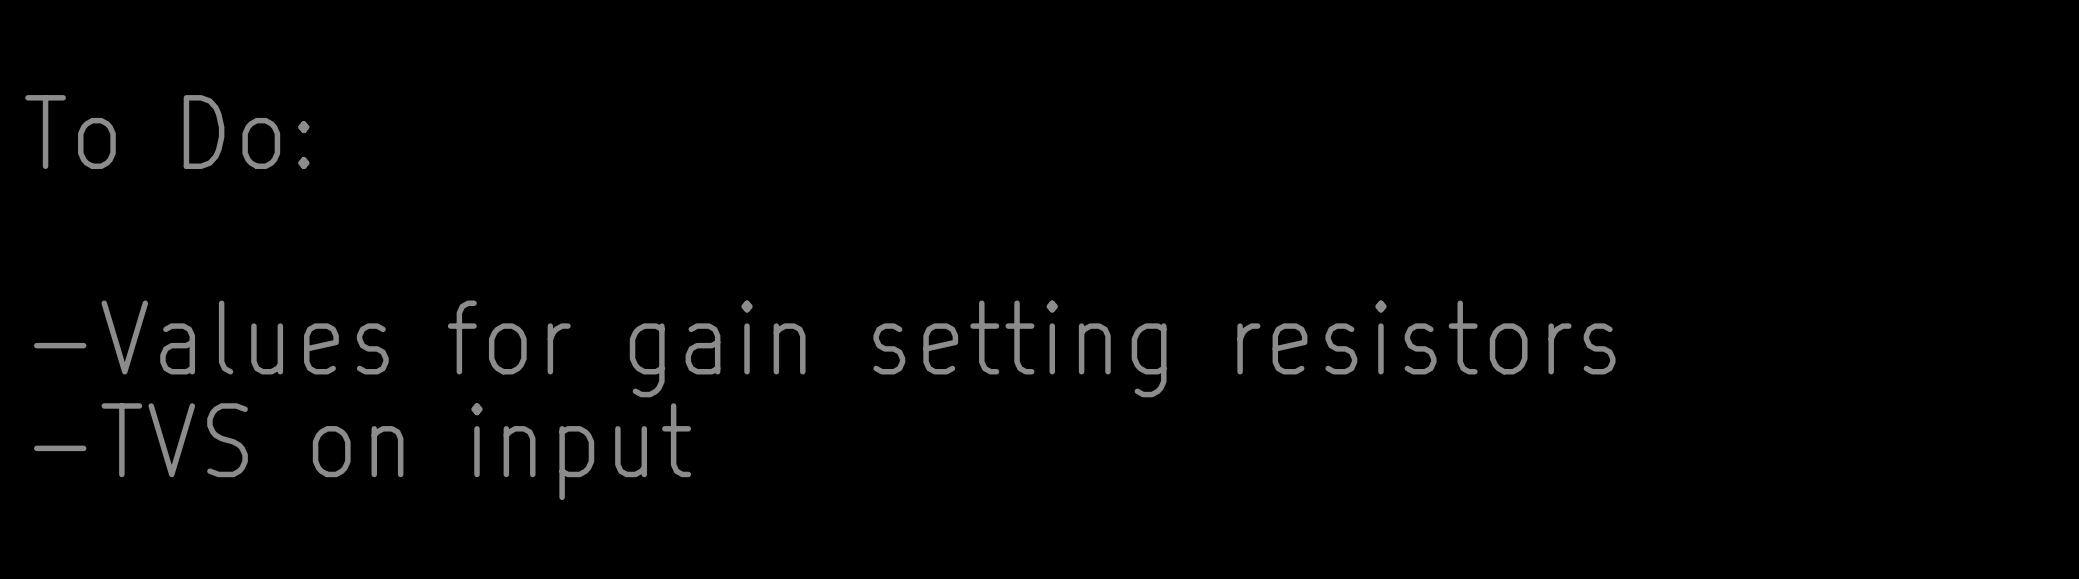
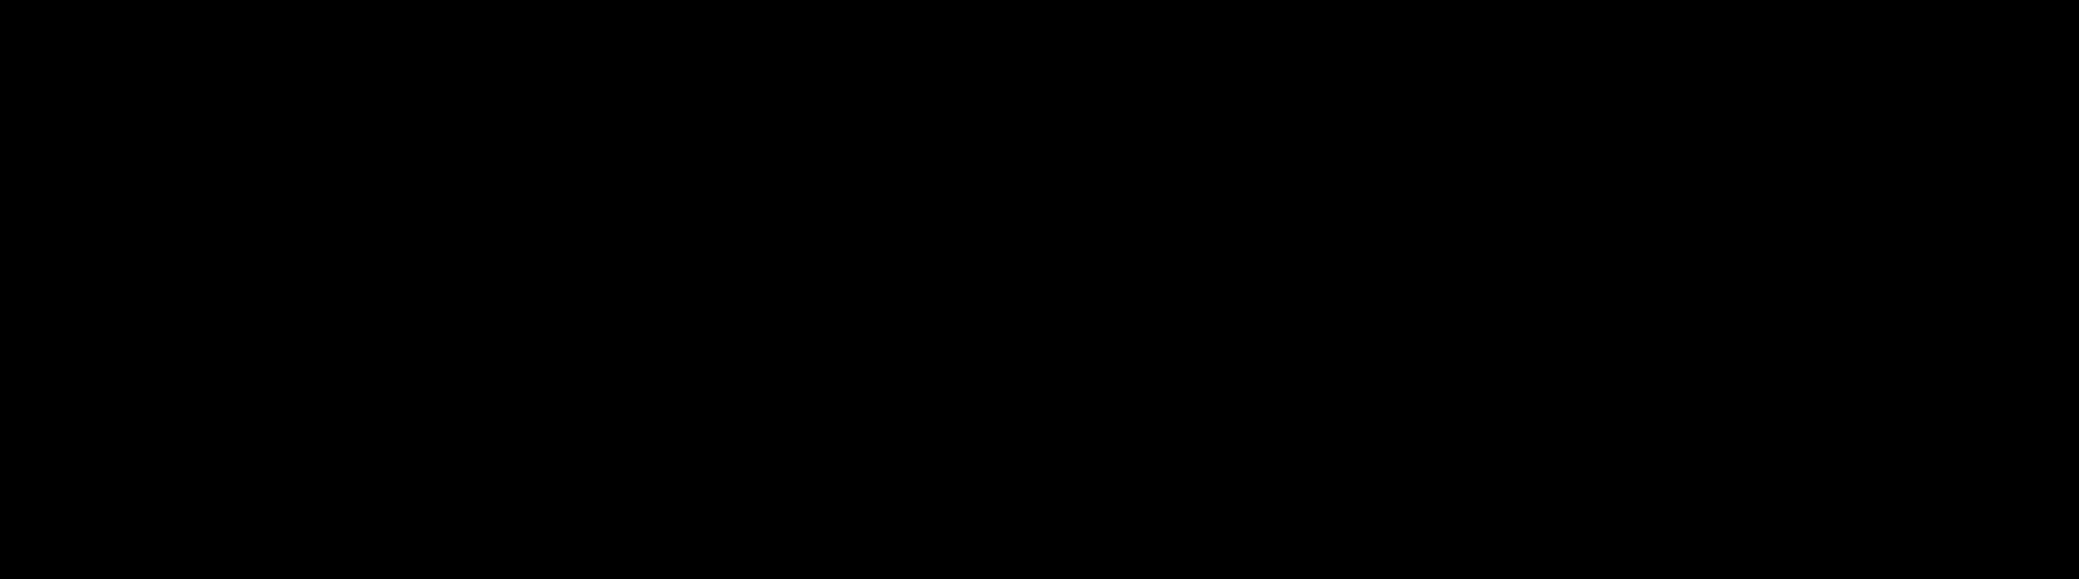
text: To Do: (167, 132) -> none
text: -Values for gain setting resistors (824, 348) -> none
text: -TVS on input (362, 451) -> none

